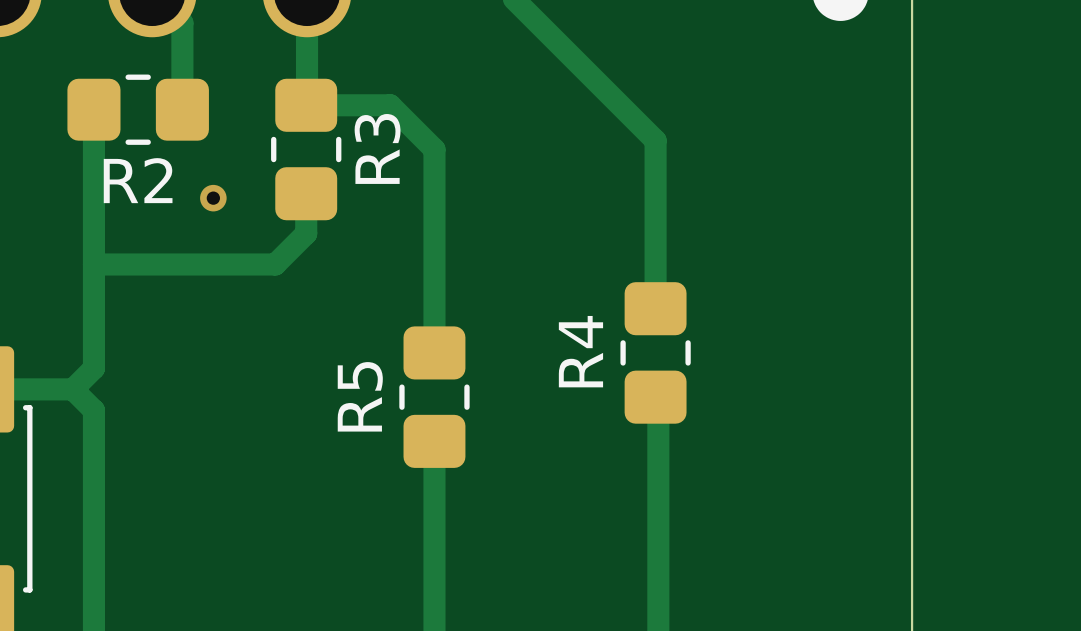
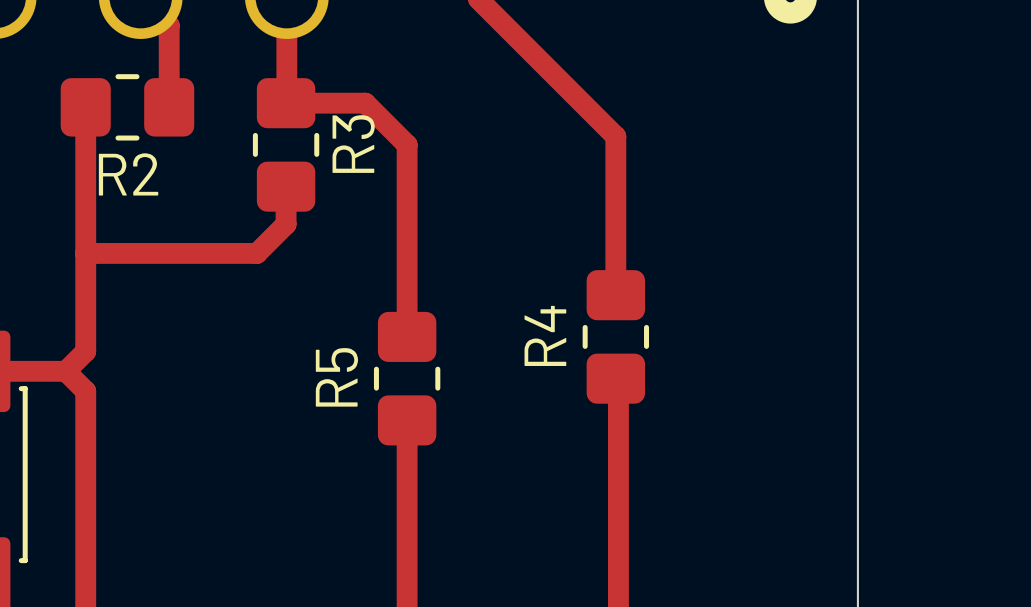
via: (213, 198) -> none

